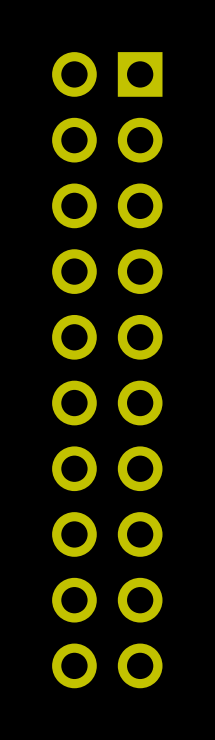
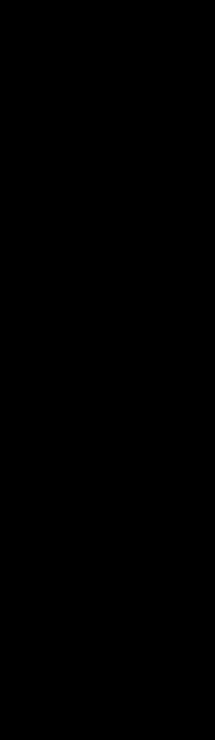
part: (107, 370) -> none

